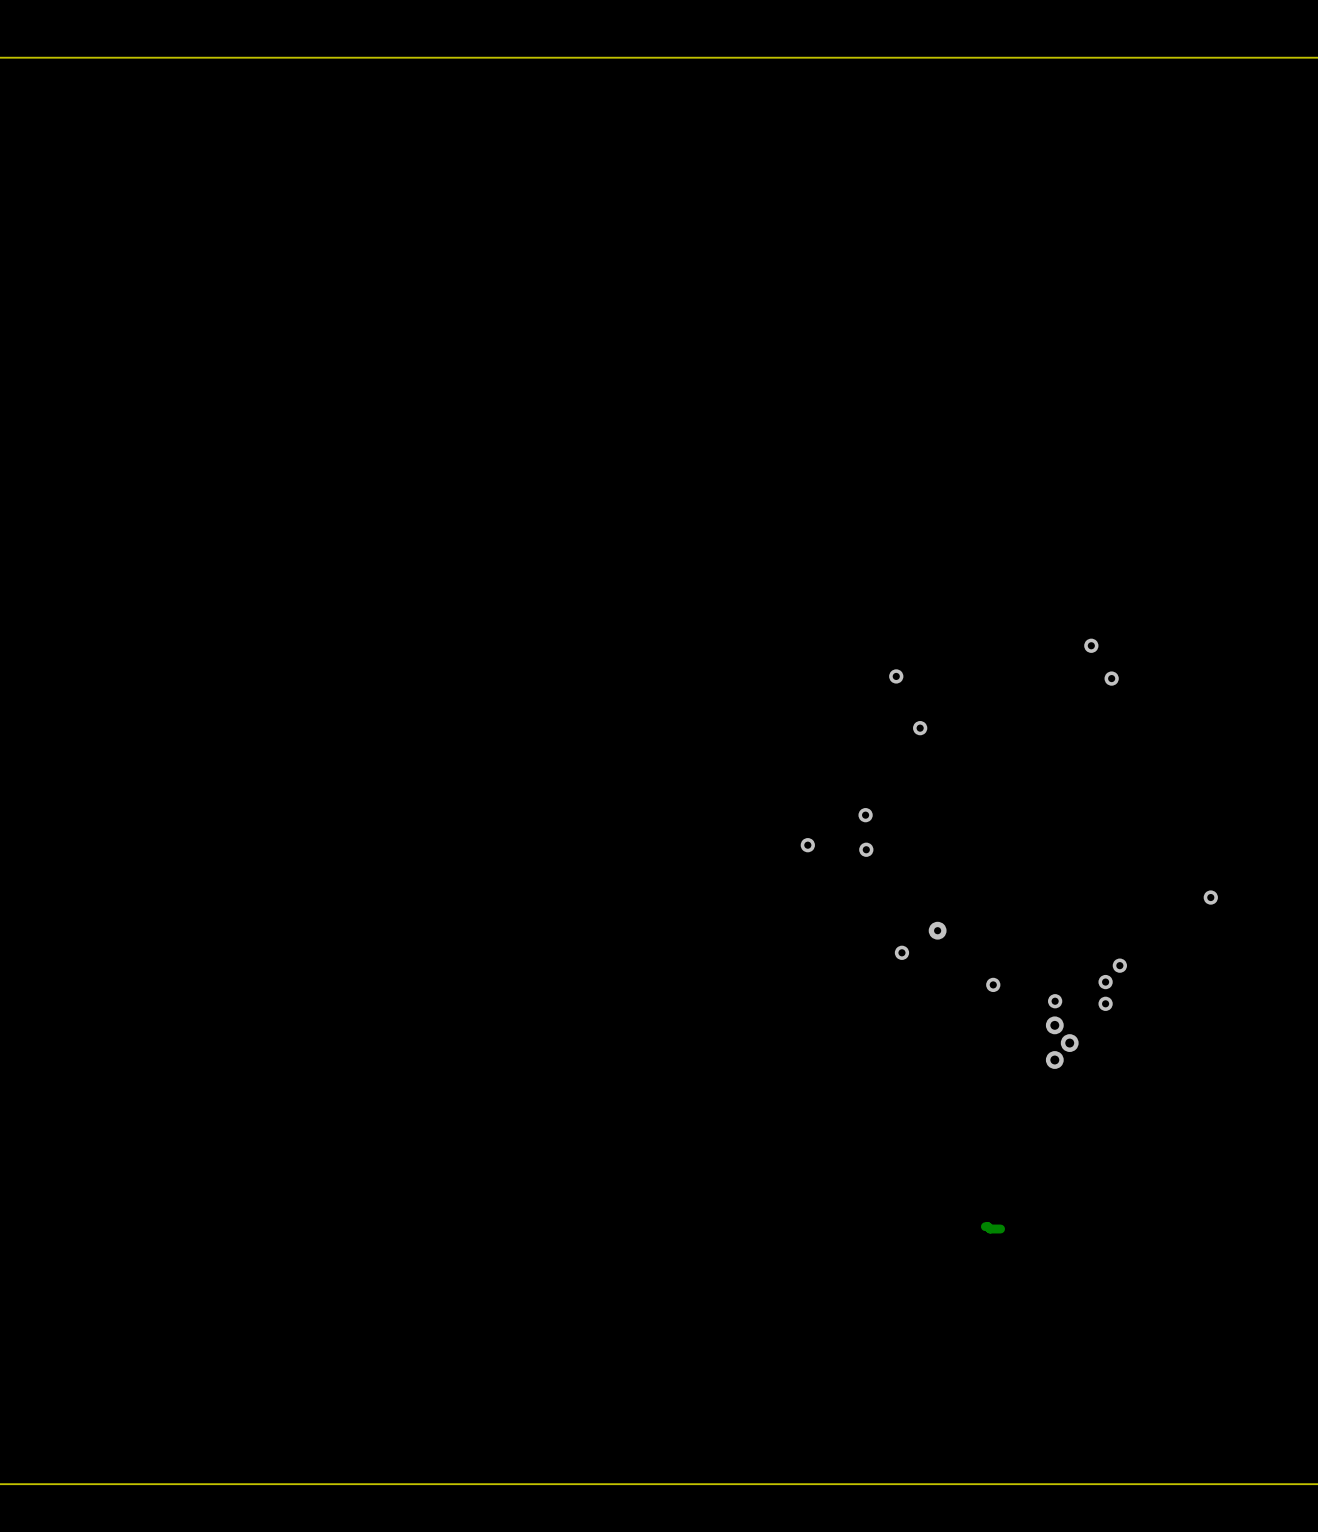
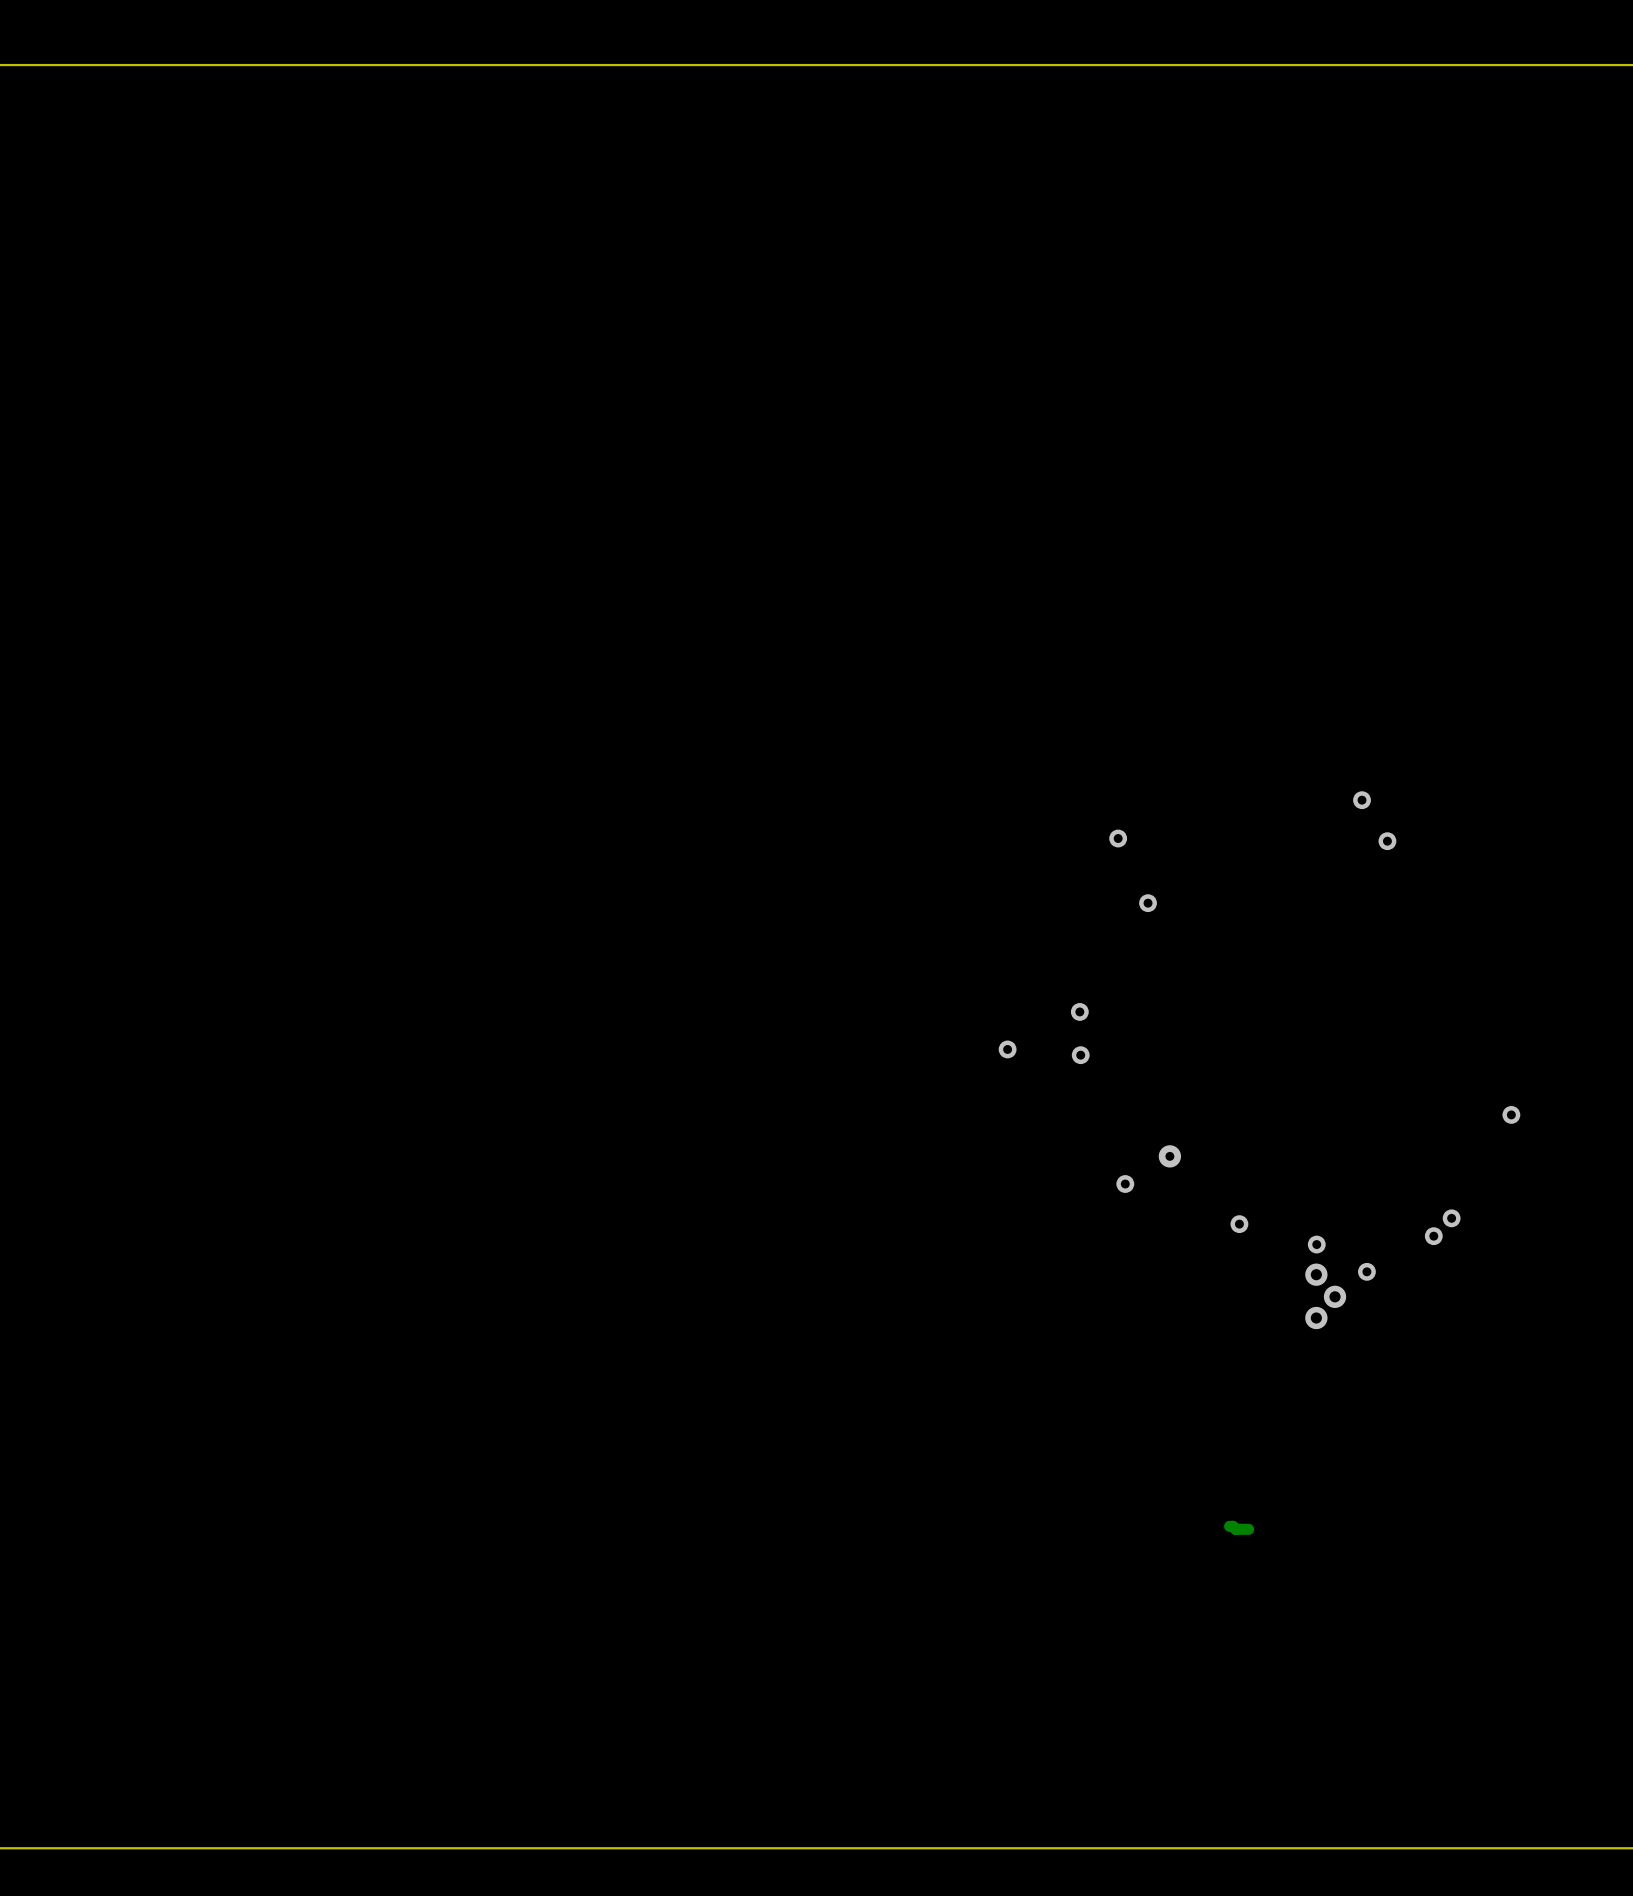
via: (1119, 965) -> none
via: none -> (1451, 1218)
via: (1105, 982) -> none
via: none -> (1433, 1236)
via: (1105, 1003) -> none
via: none -> (1366, 1271)

